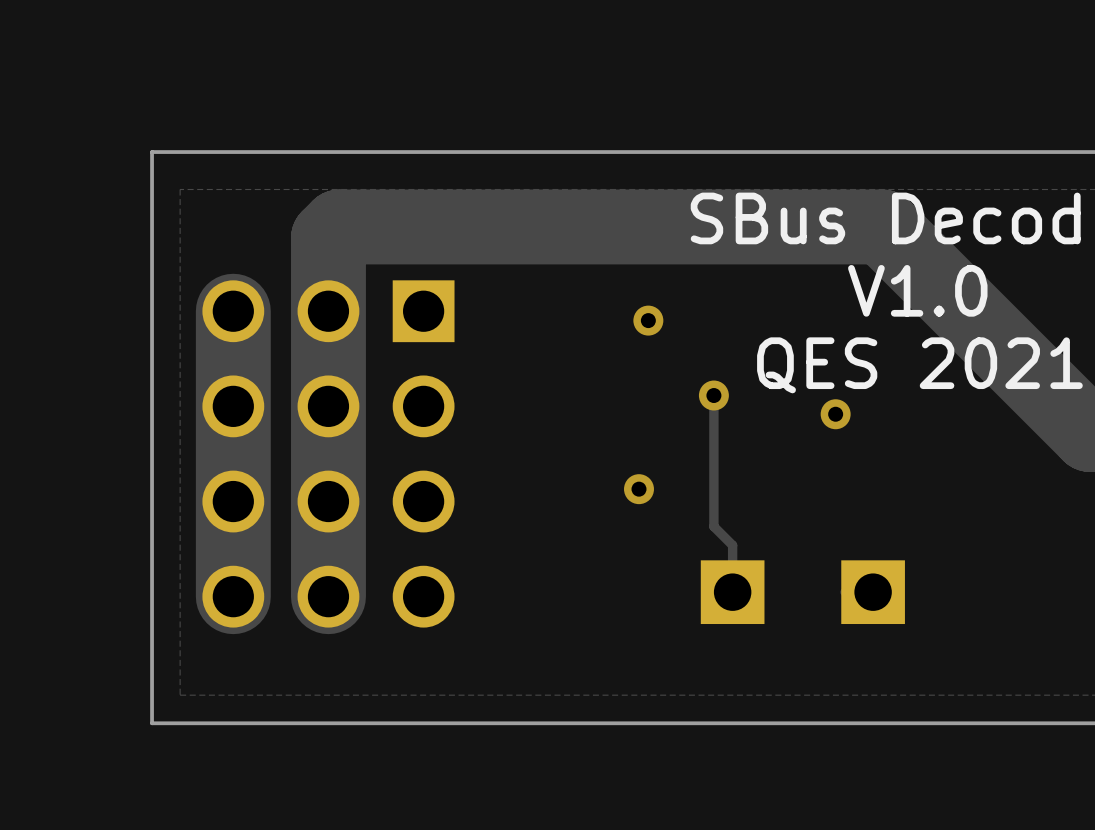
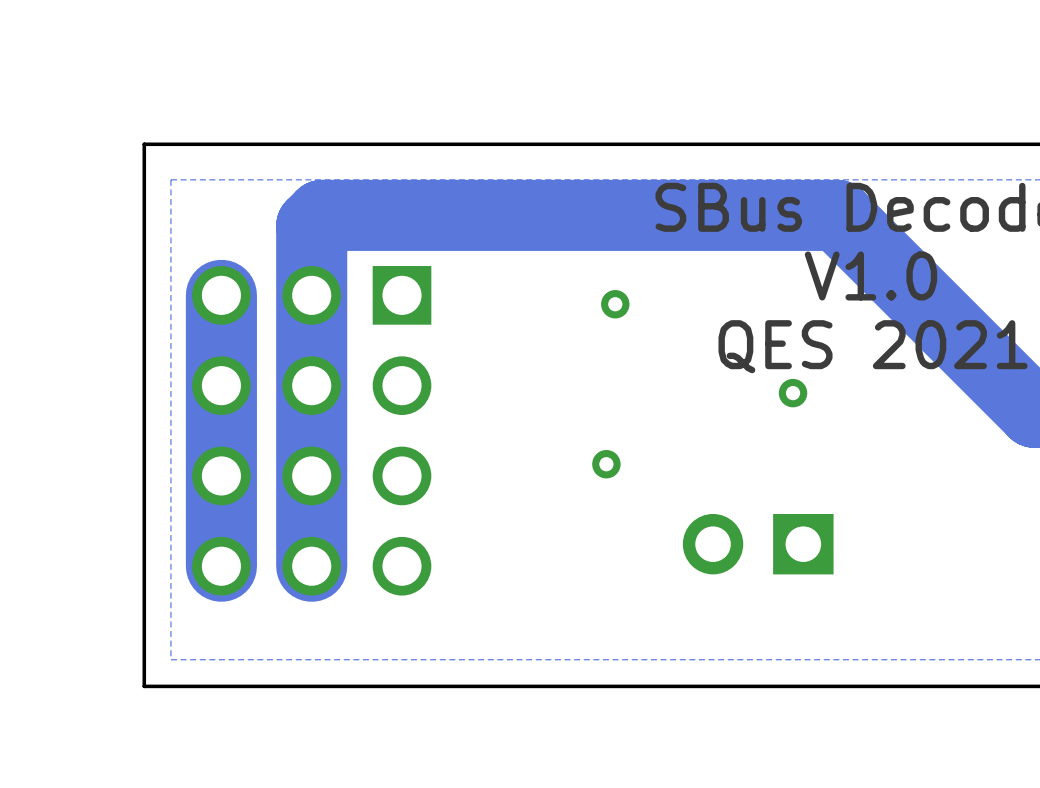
track: (713, 395) (713, 526) (732, 545) (732, 592) -> none
via: (713, 395) -> none
part: none -> (758, 544)
part: (732, 592) -> none
part: (873, 592) -> none

